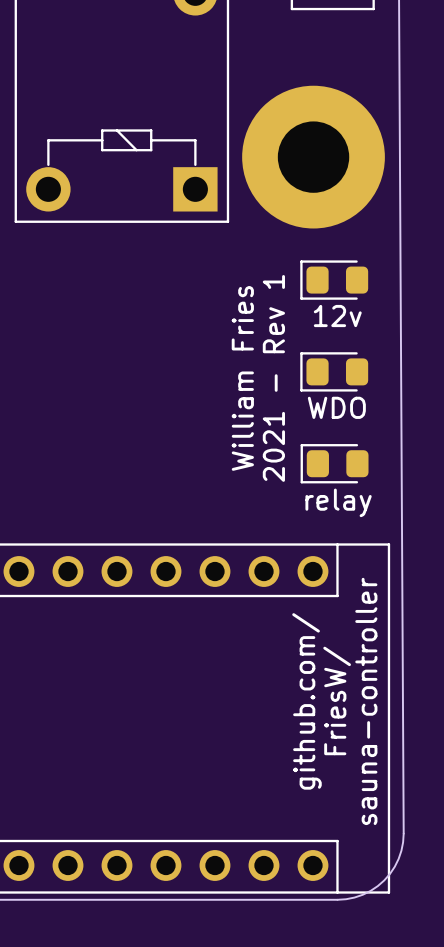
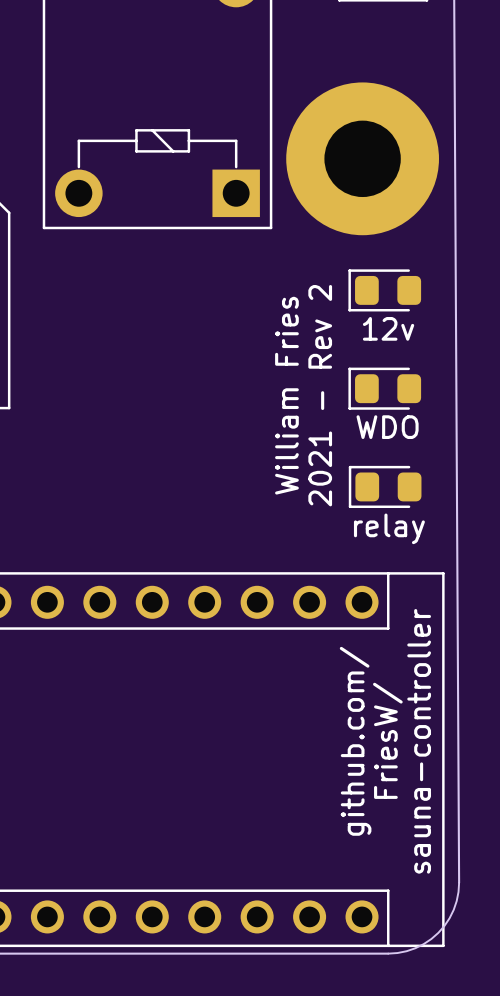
text: 2021 - Rev 1 (273, 378) -> 2021 - Rev 2 (320, 395)

